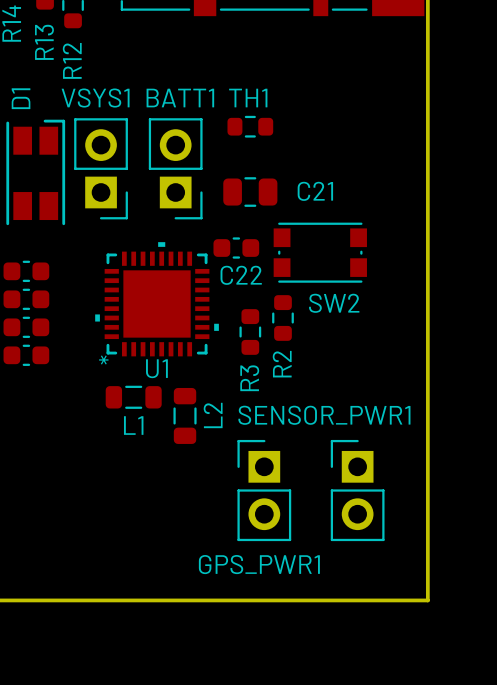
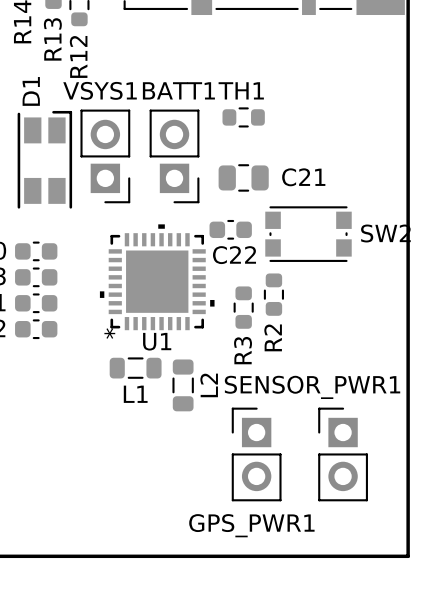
SW2 name position: SW2 (334, 303) -> SW2 (385, 233)

